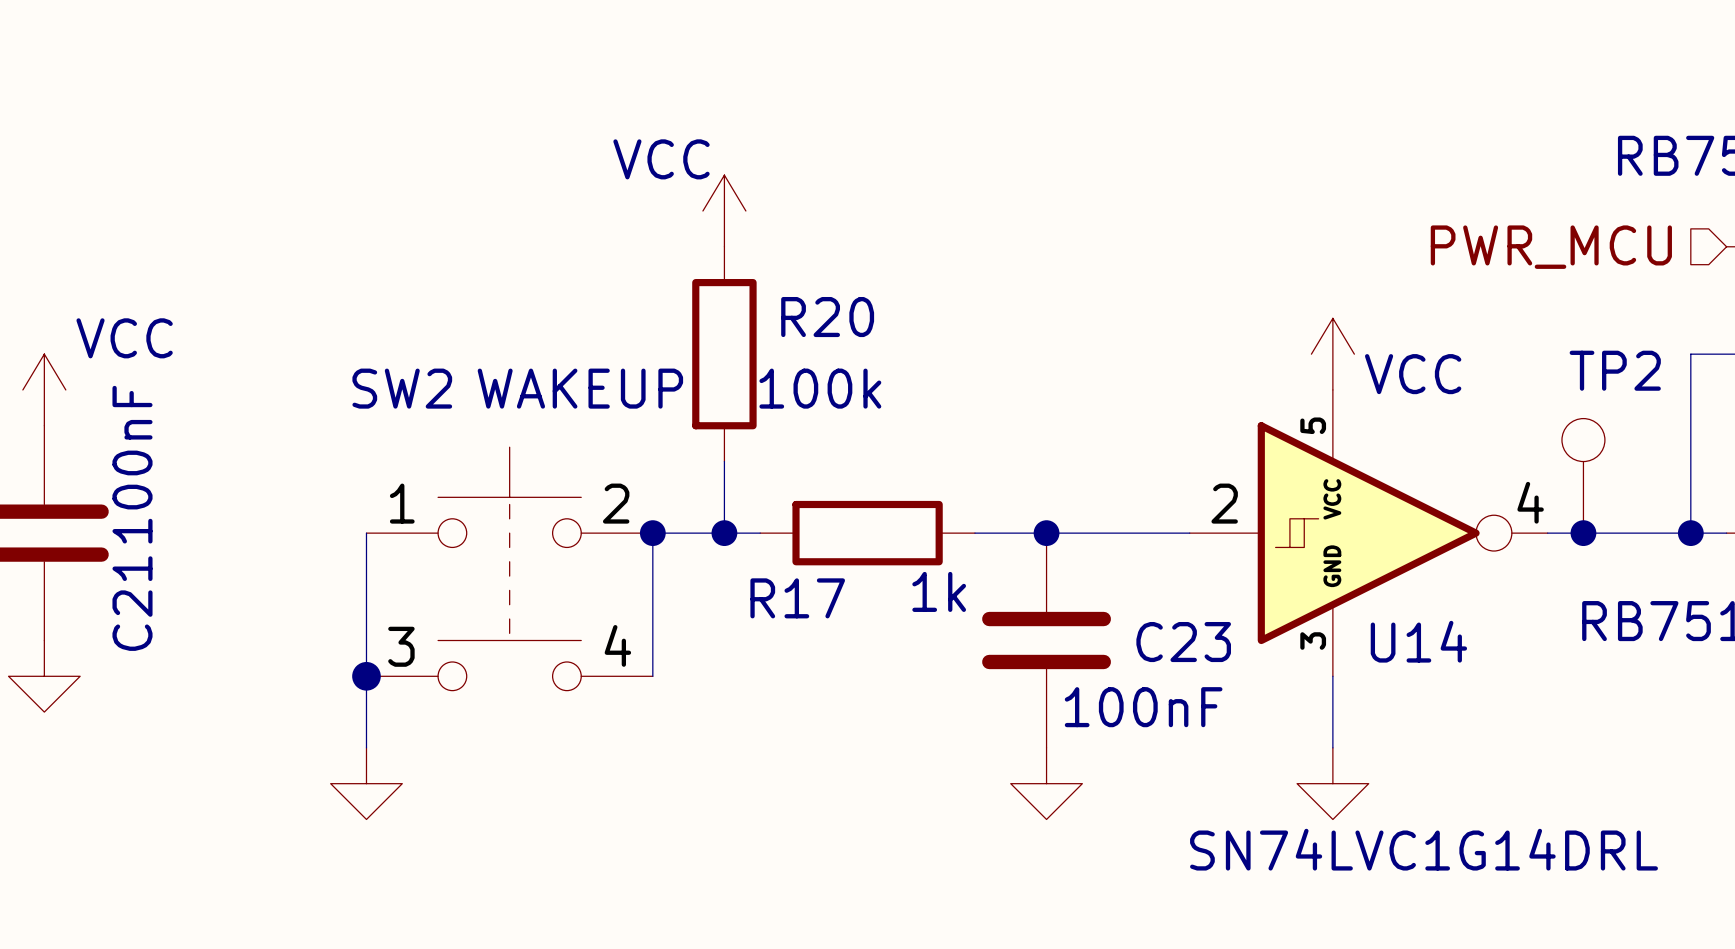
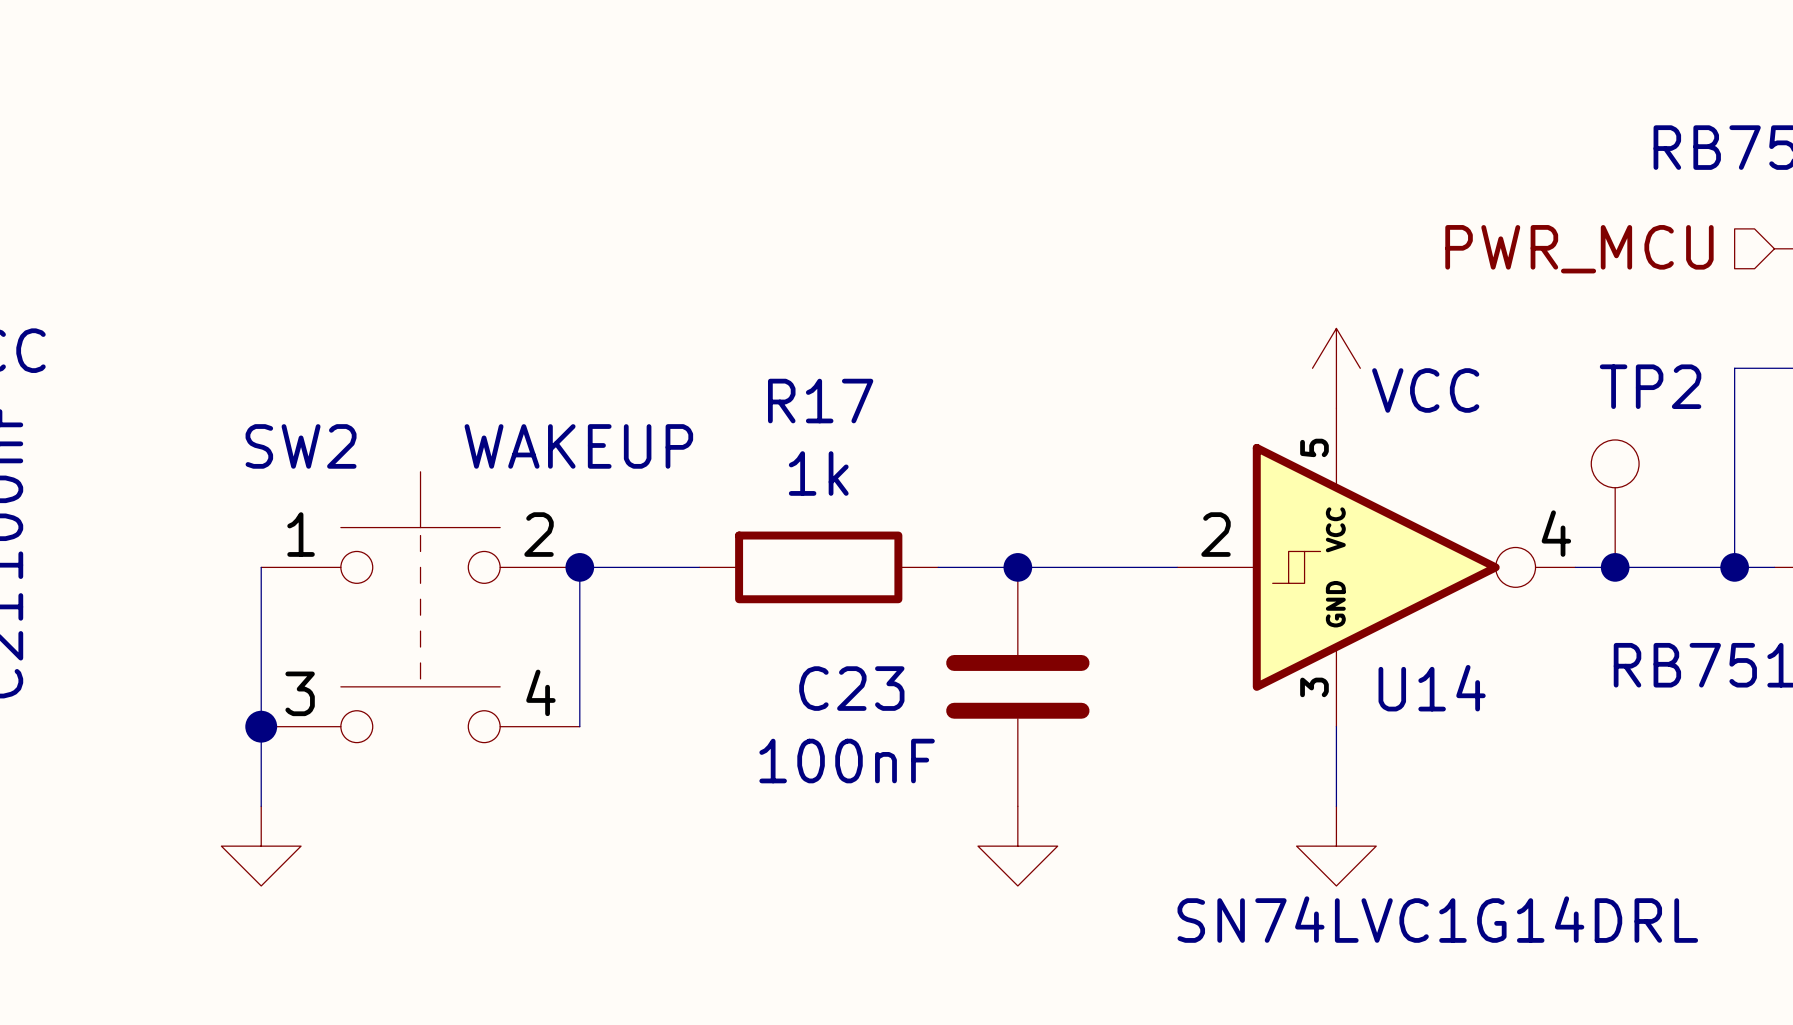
power symbol: VCC (724, 210) -> none
R20: 100k (724, 354) -> none
SW2 name position: SW2 (402, 388) -> SW2 (301, 446)
SW2 value position: WAKEUP (580, 388) -> WAKEUP (578, 446)
wire: (724, 461) (724, 533) -> none
junction: (724, 533) -> none
R17 value position: 1k (939, 591) -> 1k (818, 473)
R17 name position: R17 (797, 598) -> R17 (820, 401)
C23 name position: C23 (1183, 642) -> C23 (851, 688)
C23 value position: 100nF (1143, 707) -> 100nF (847, 761)

